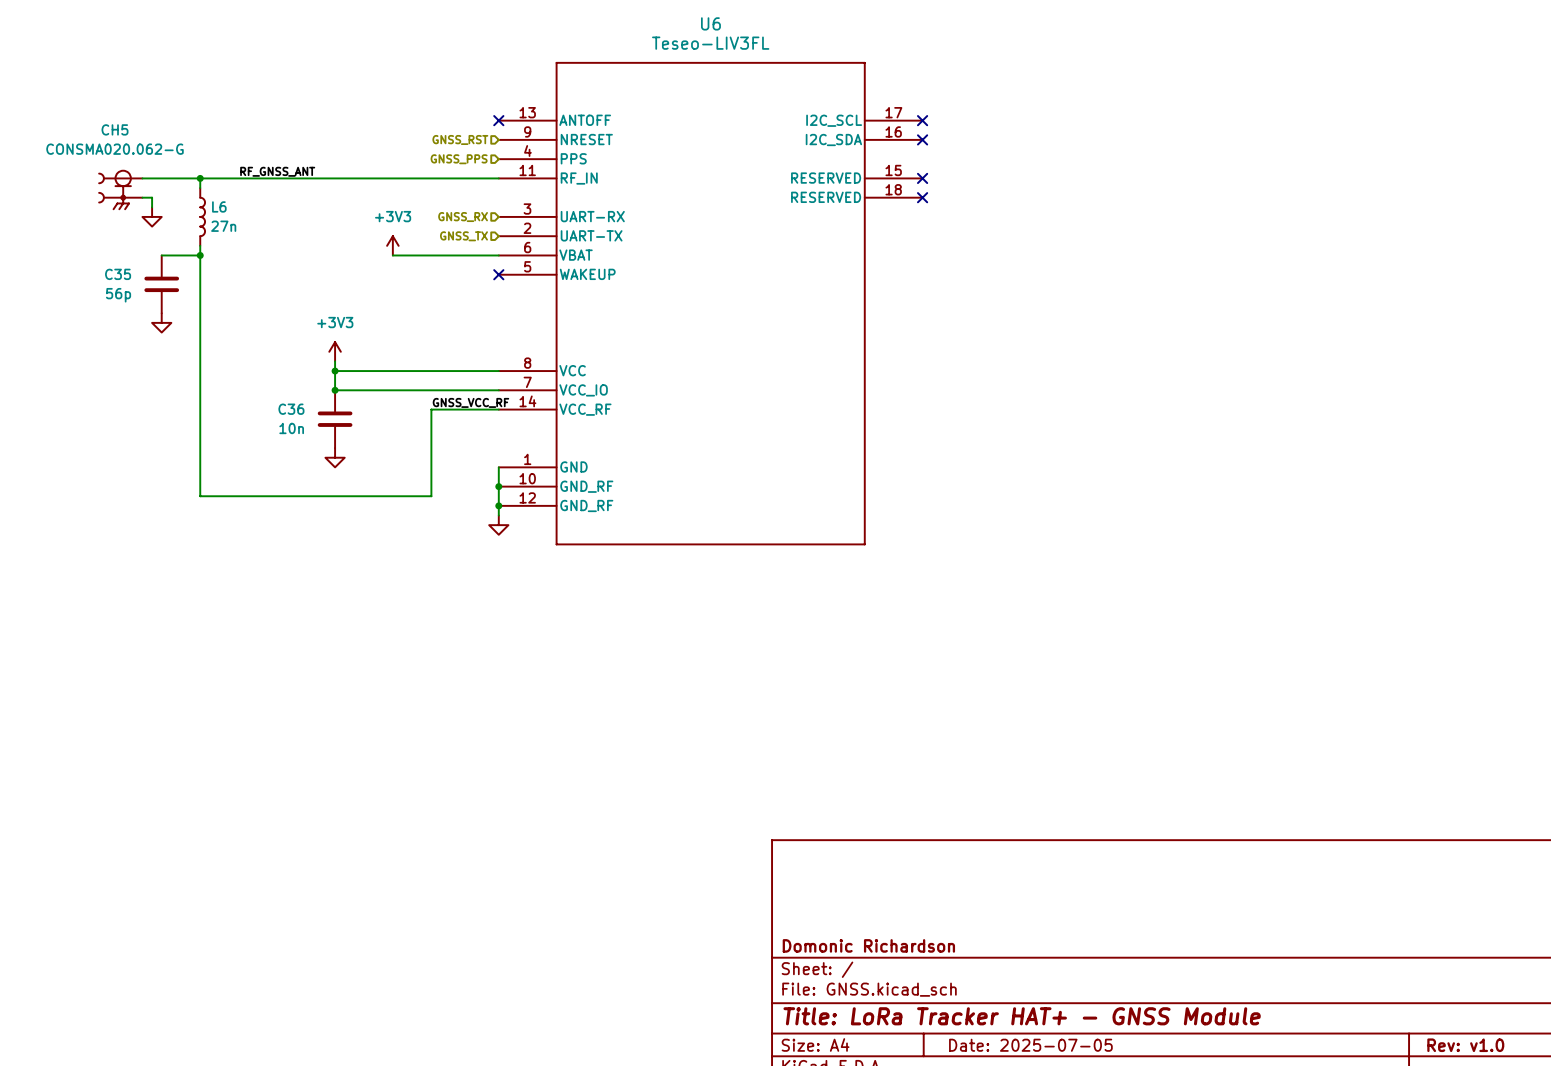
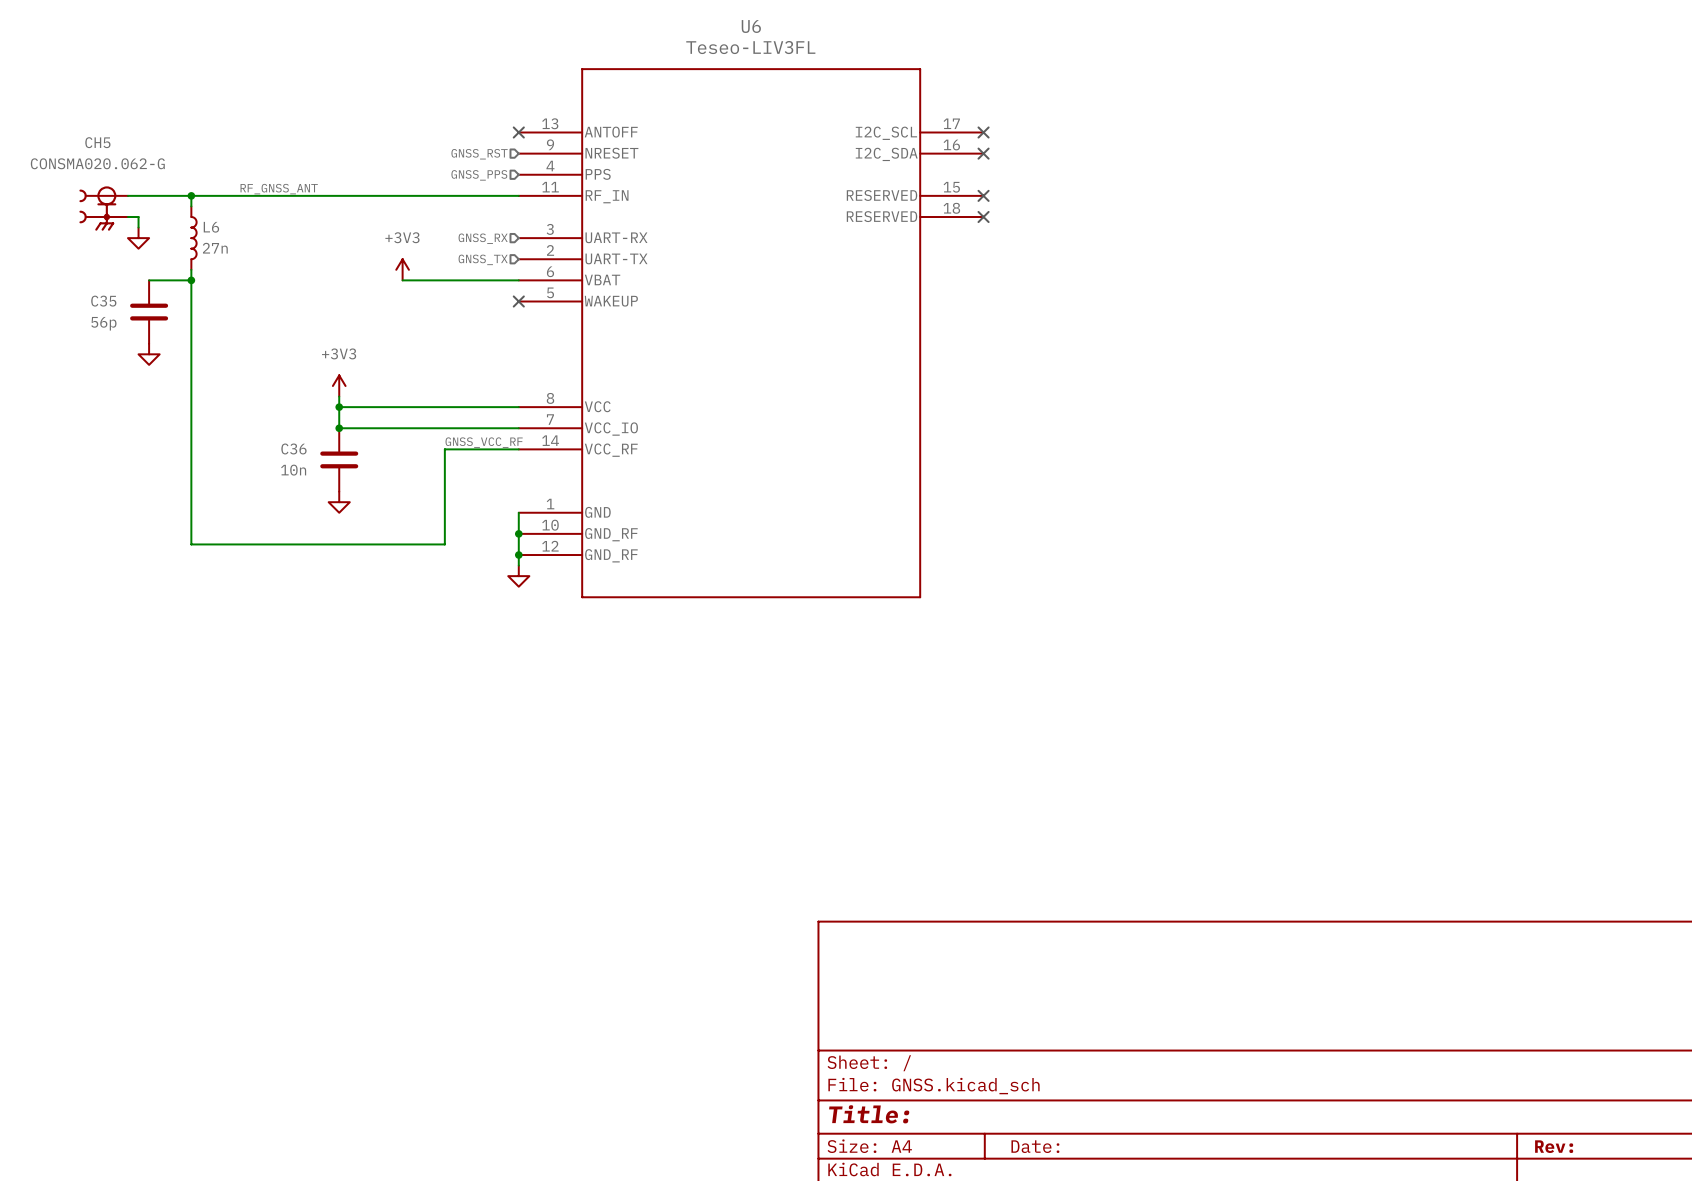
title block: Domonic Richardson (868, 945) -> none
title block: Title: LoRa Tracker HAT+ - GNSS Module (1022, 1016) -> Title: (869, 1114)
title block: Date: 2025-07-05 (1030, 1045) -> Date: (1035, 1146)
title block: Rev: v1.0 (1465, 1045) -> Rev: (1554, 1146)

